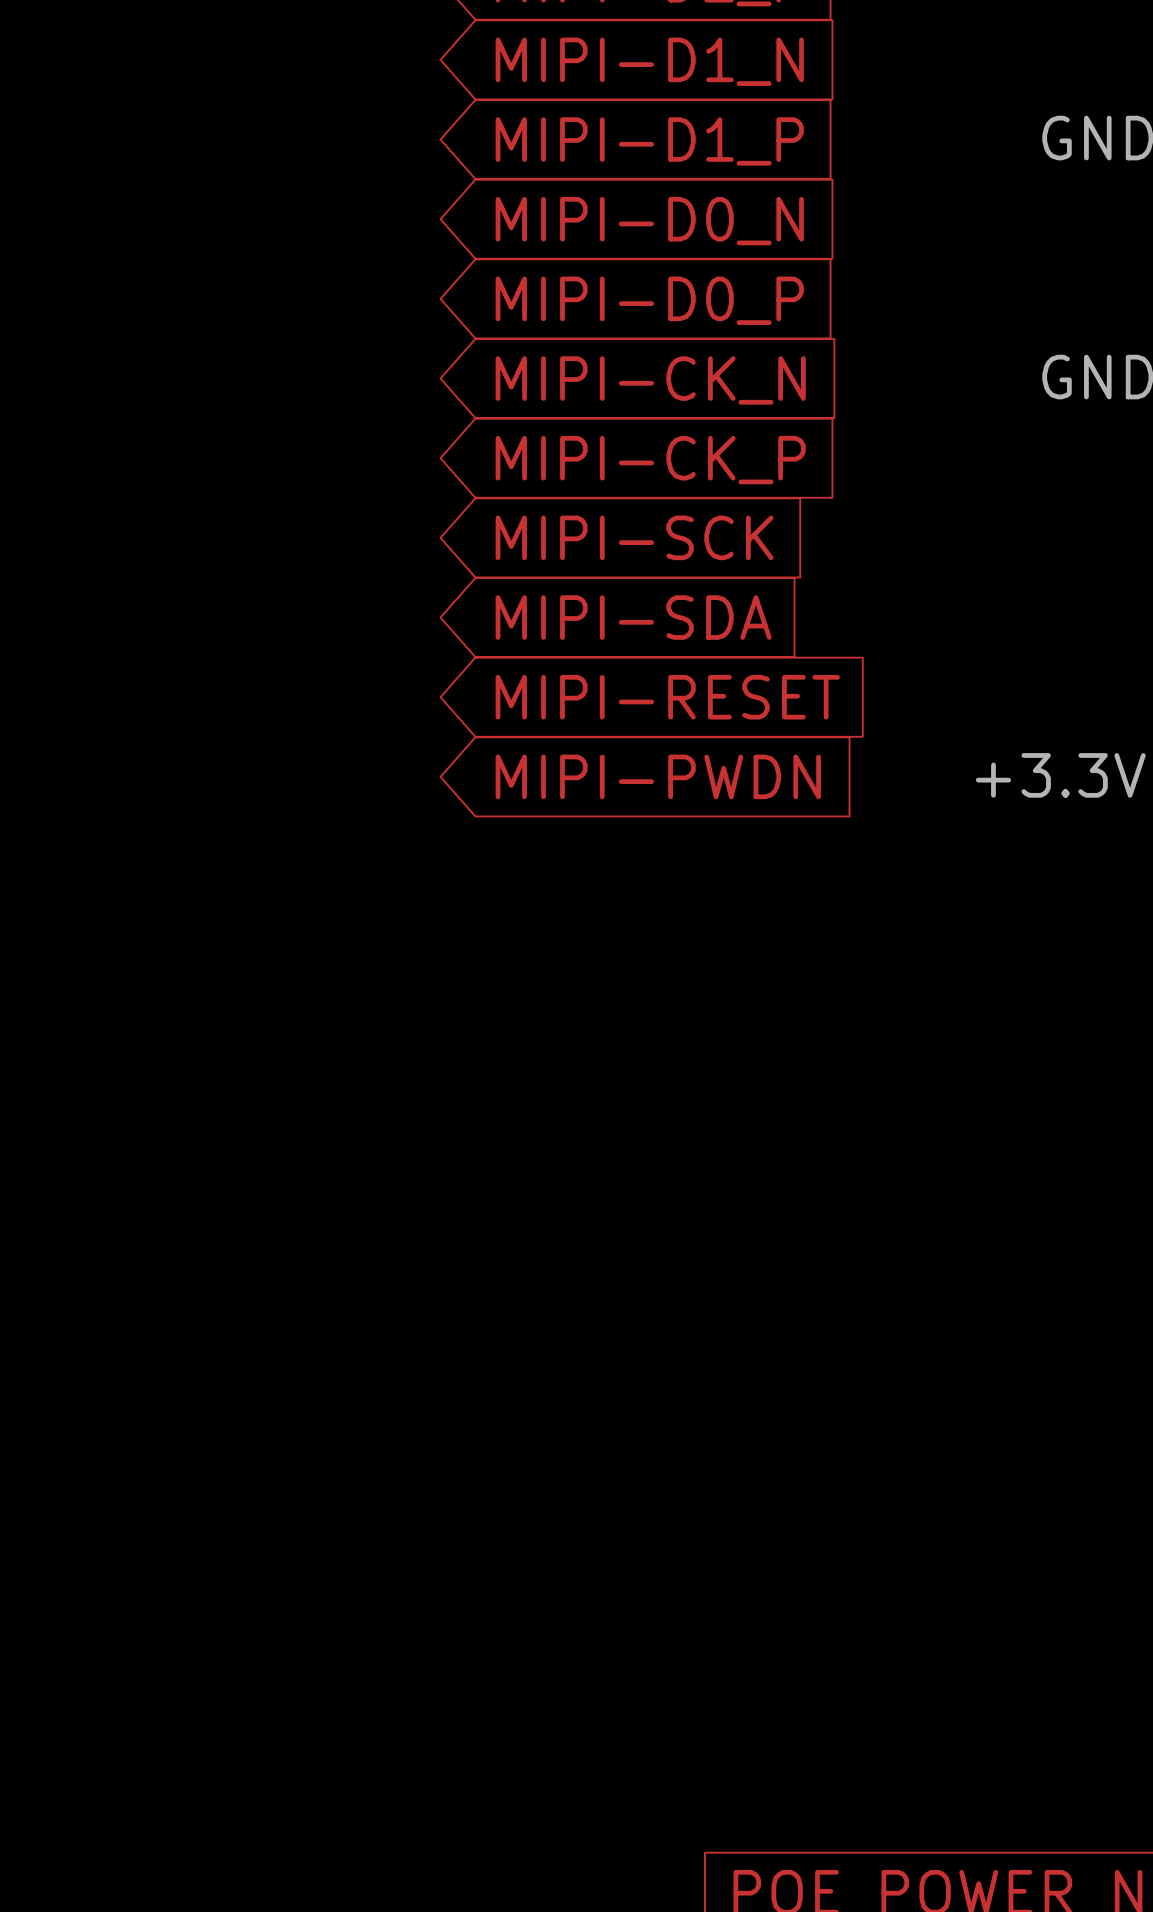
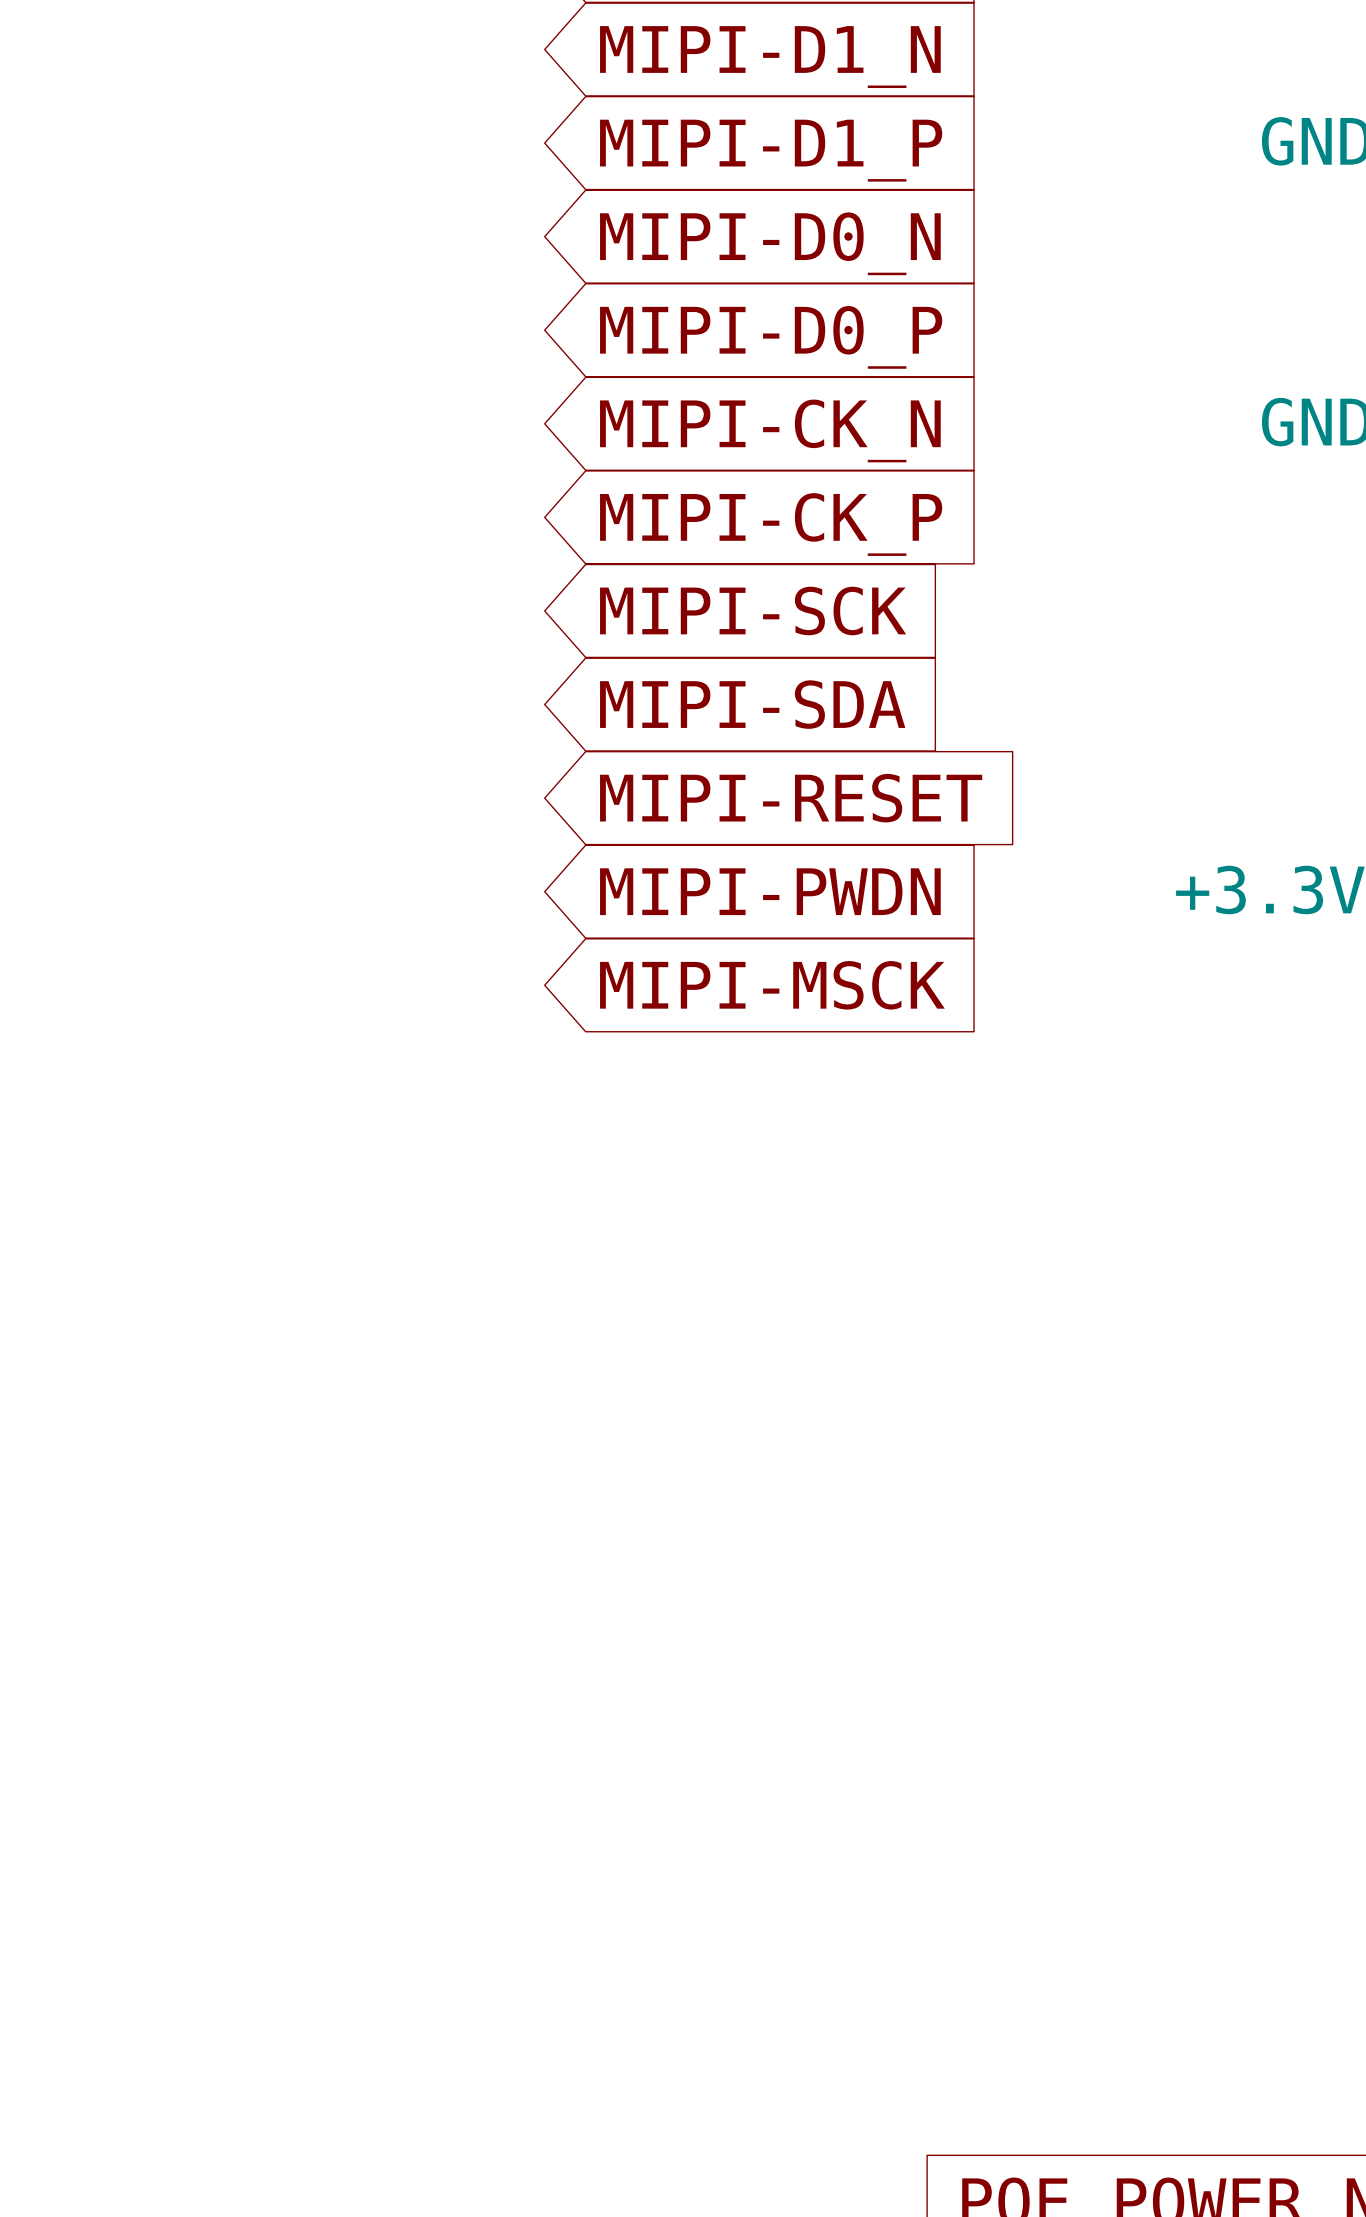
global label: none -> MIPI-MSCK (772, 985)

